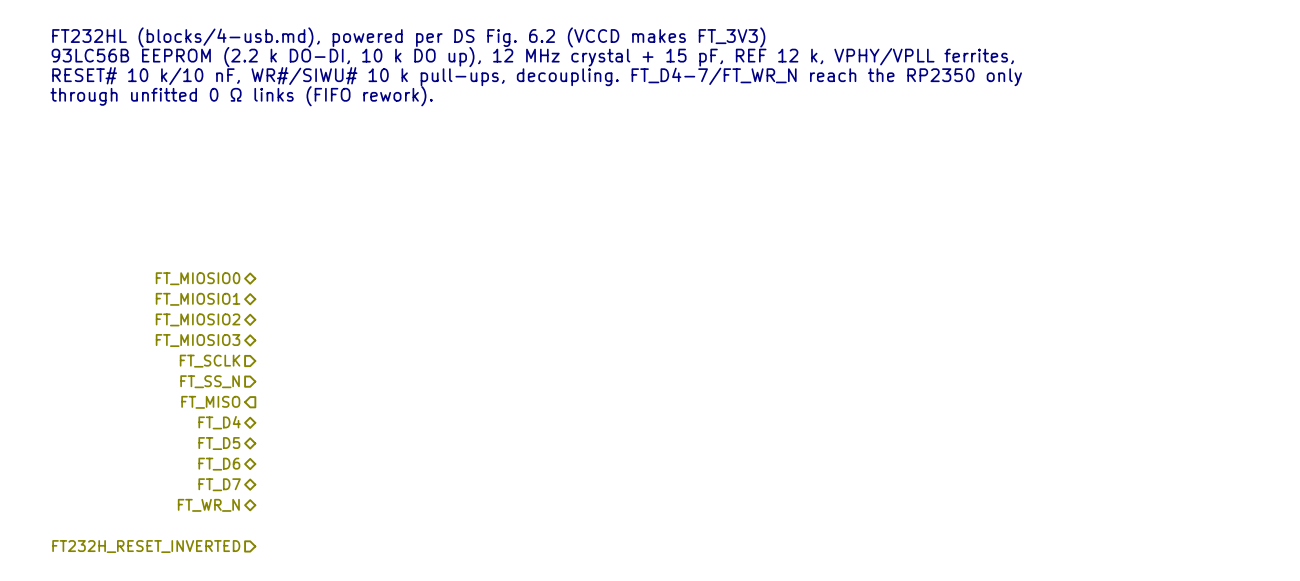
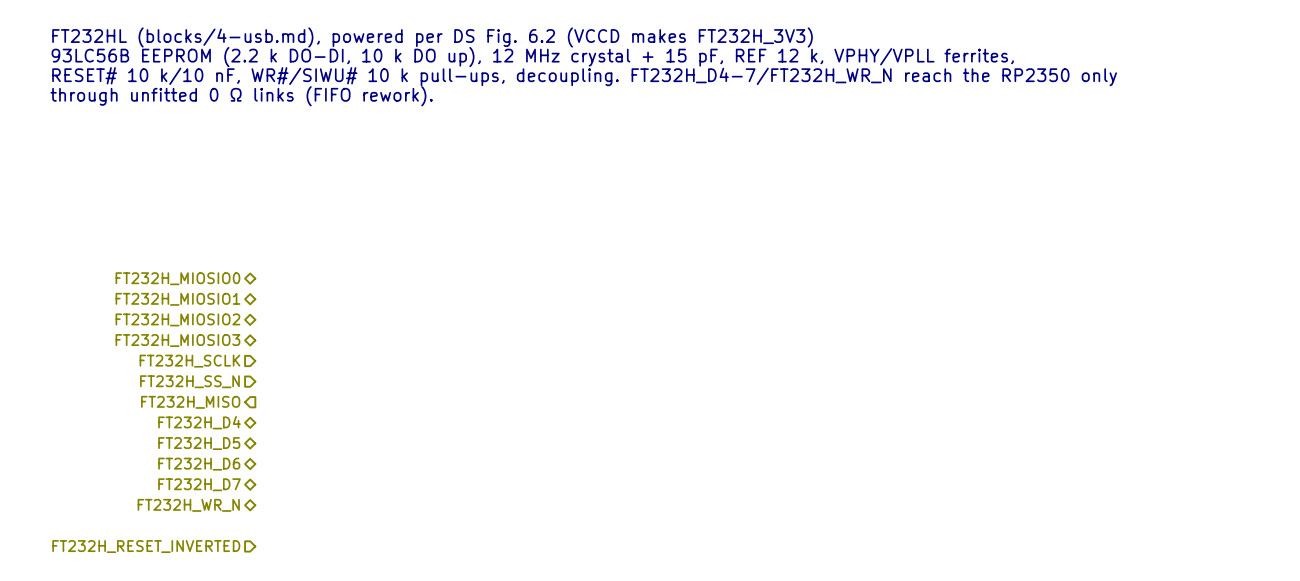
text: FT232HL (blocks/4-usb.md), powered per DS Fig. 6.2 (VCCD makes FT_3V3) (408, 37) -> FT232HL (blocks/4-usb.md), powered per DS Fig. 6.2 (VCCD makes FT232H_3V3) (432, 37)
text: RESET# 10 k/10 nF, WR#/SIWU# 10 k pull-ups, decoupling. FT_D4-7/FT_WR_N reach the RP2350 only (537, 76) -> RESET# 10 k/10 nF, WR#/SIWU# 10 k pull-ups, decoupling. FT232H_D4-7/FT232H_WR_N reach the RP2350 only (584, 76)
hierarchical label: FT_MIOSIO0 (198, 278) -> FT232H_MIOSIO0 (177, 278)
hierarchical label: FT_MIOSIO1 (198, 299) -> FT232H_MIOSIO1 (177, 299)
hierarchical label: FT_MIOSIO2 (198, 319) -> FT232H_MIOSIO2 (177, 319)
hierarchical label: FT_MIOSIO3 (198, 340) -> FT232H_MIOSIO3 (177, 340)
hierarchical label: FT_SCLK (210, 361) -> FT232H_SCLK (189, 361)
hierarchical label: FT_SS_N (210, 381) -> FT232H_SS_N (189, 381)
hierarchical label: FT_MISO (210, 402) -> FT232H_MISO (190, 402)
hierarchical label: FT_D4 (219, 422) -> FT232H_D4 (199, 422)
hierarchical label: FT_D5 (219, 443) -> FT232H_D5 (199, 443)
hierarchical label: FT_D6 (219, 464) -> FT232H_D6 (199, 464)
hierarchical label: FT_D7 (219, 484) -> FT232H_D7 (199, 484)
hierarchical label: FT_WR_N (208, 505) -> FT232H_WR_N (188, 505)

